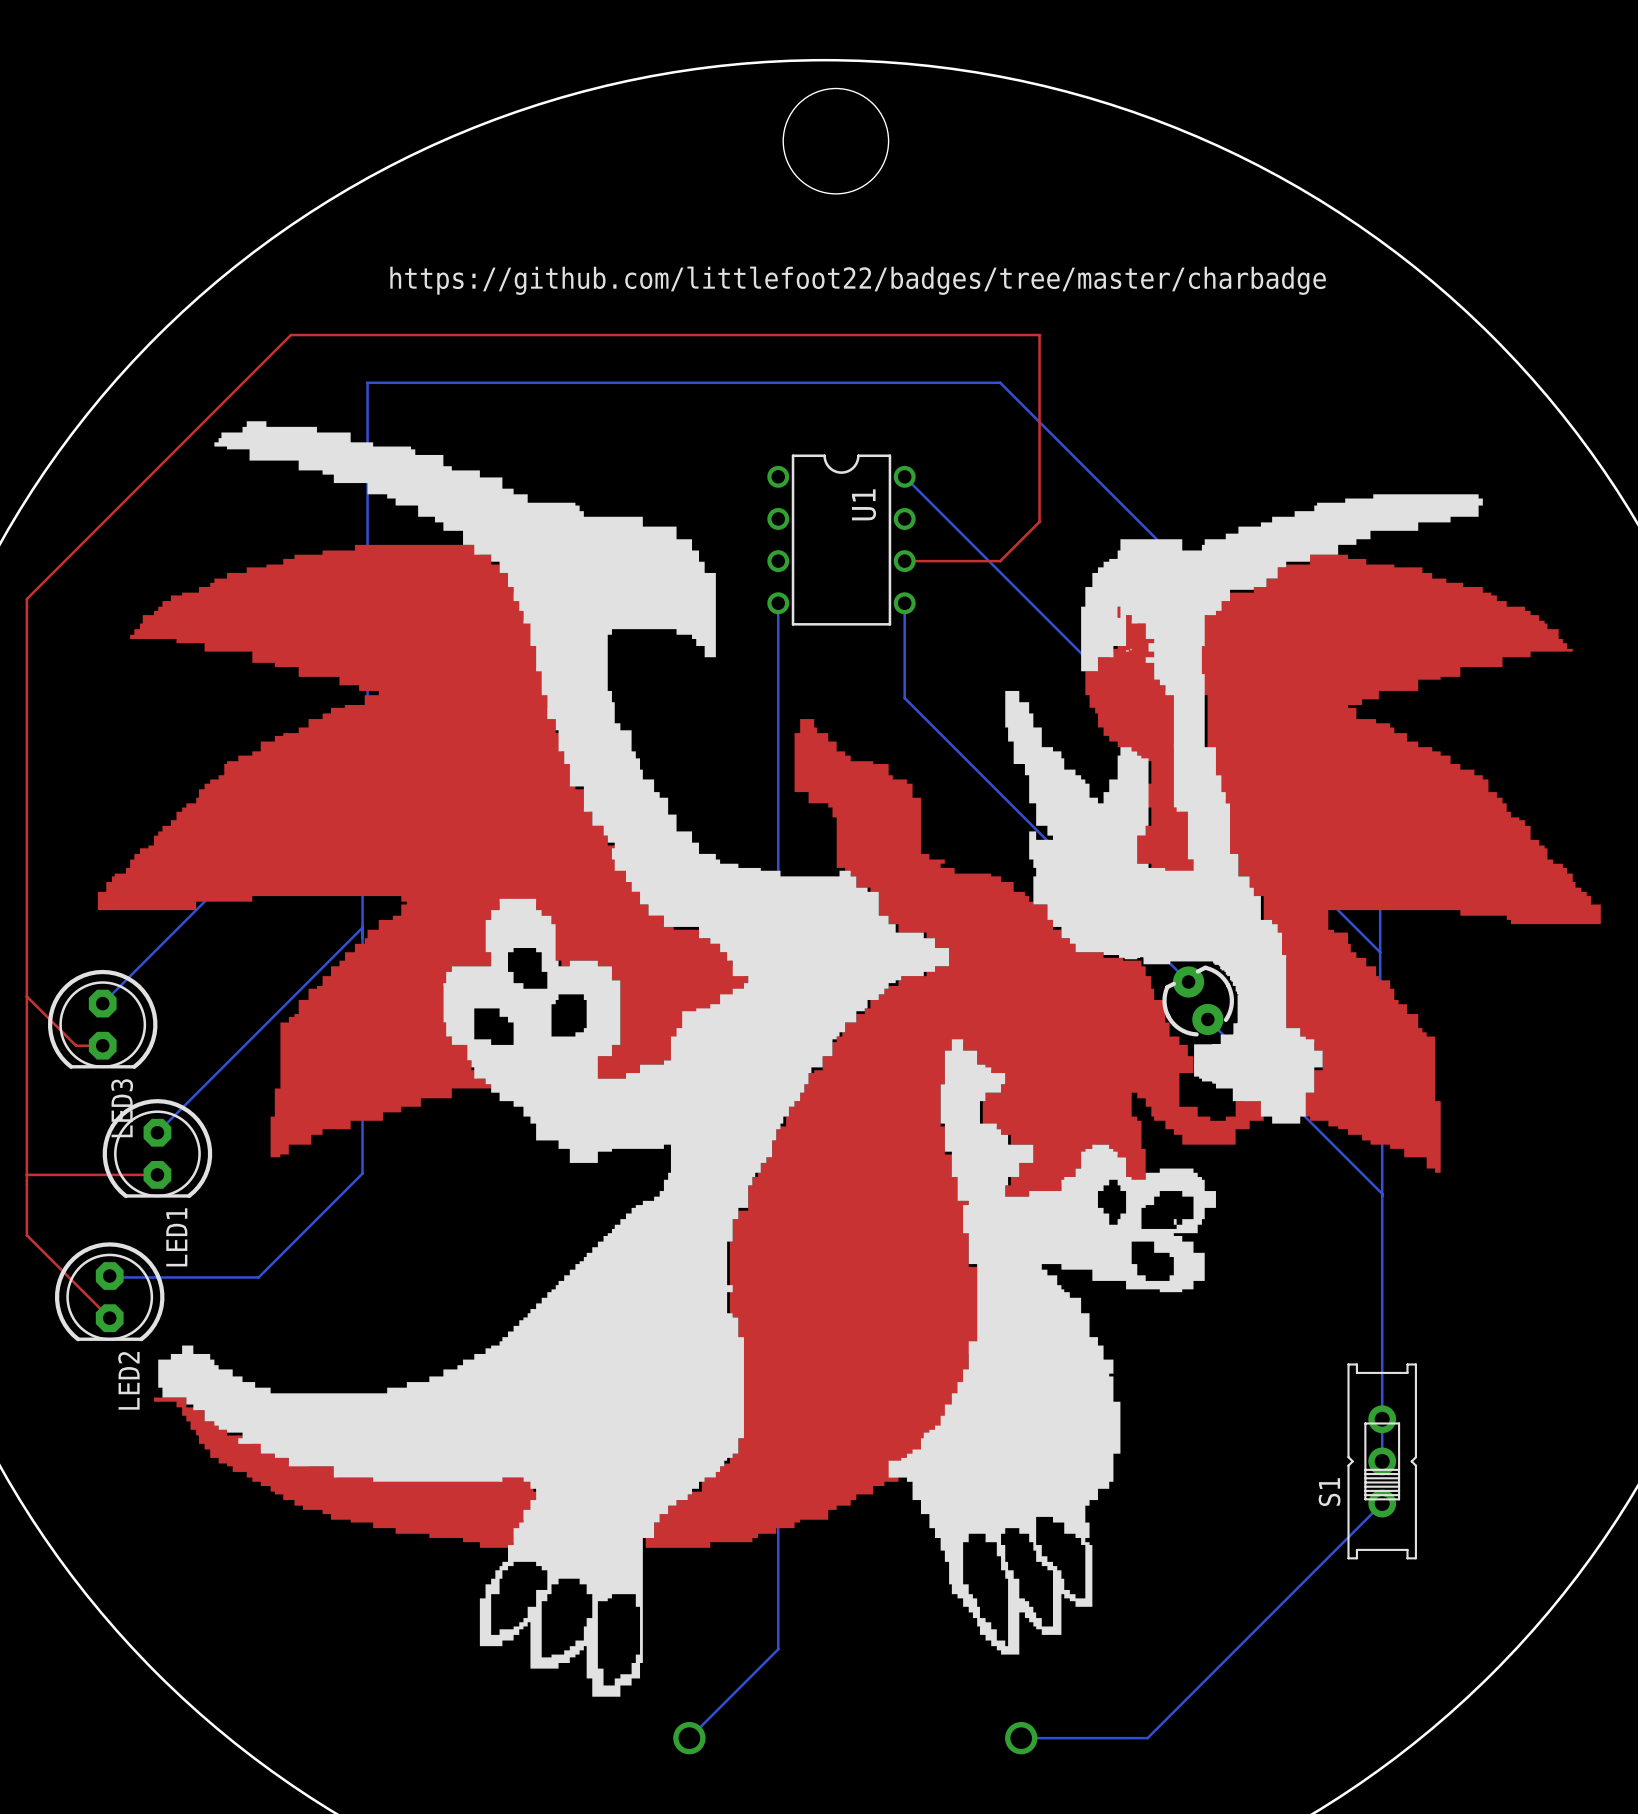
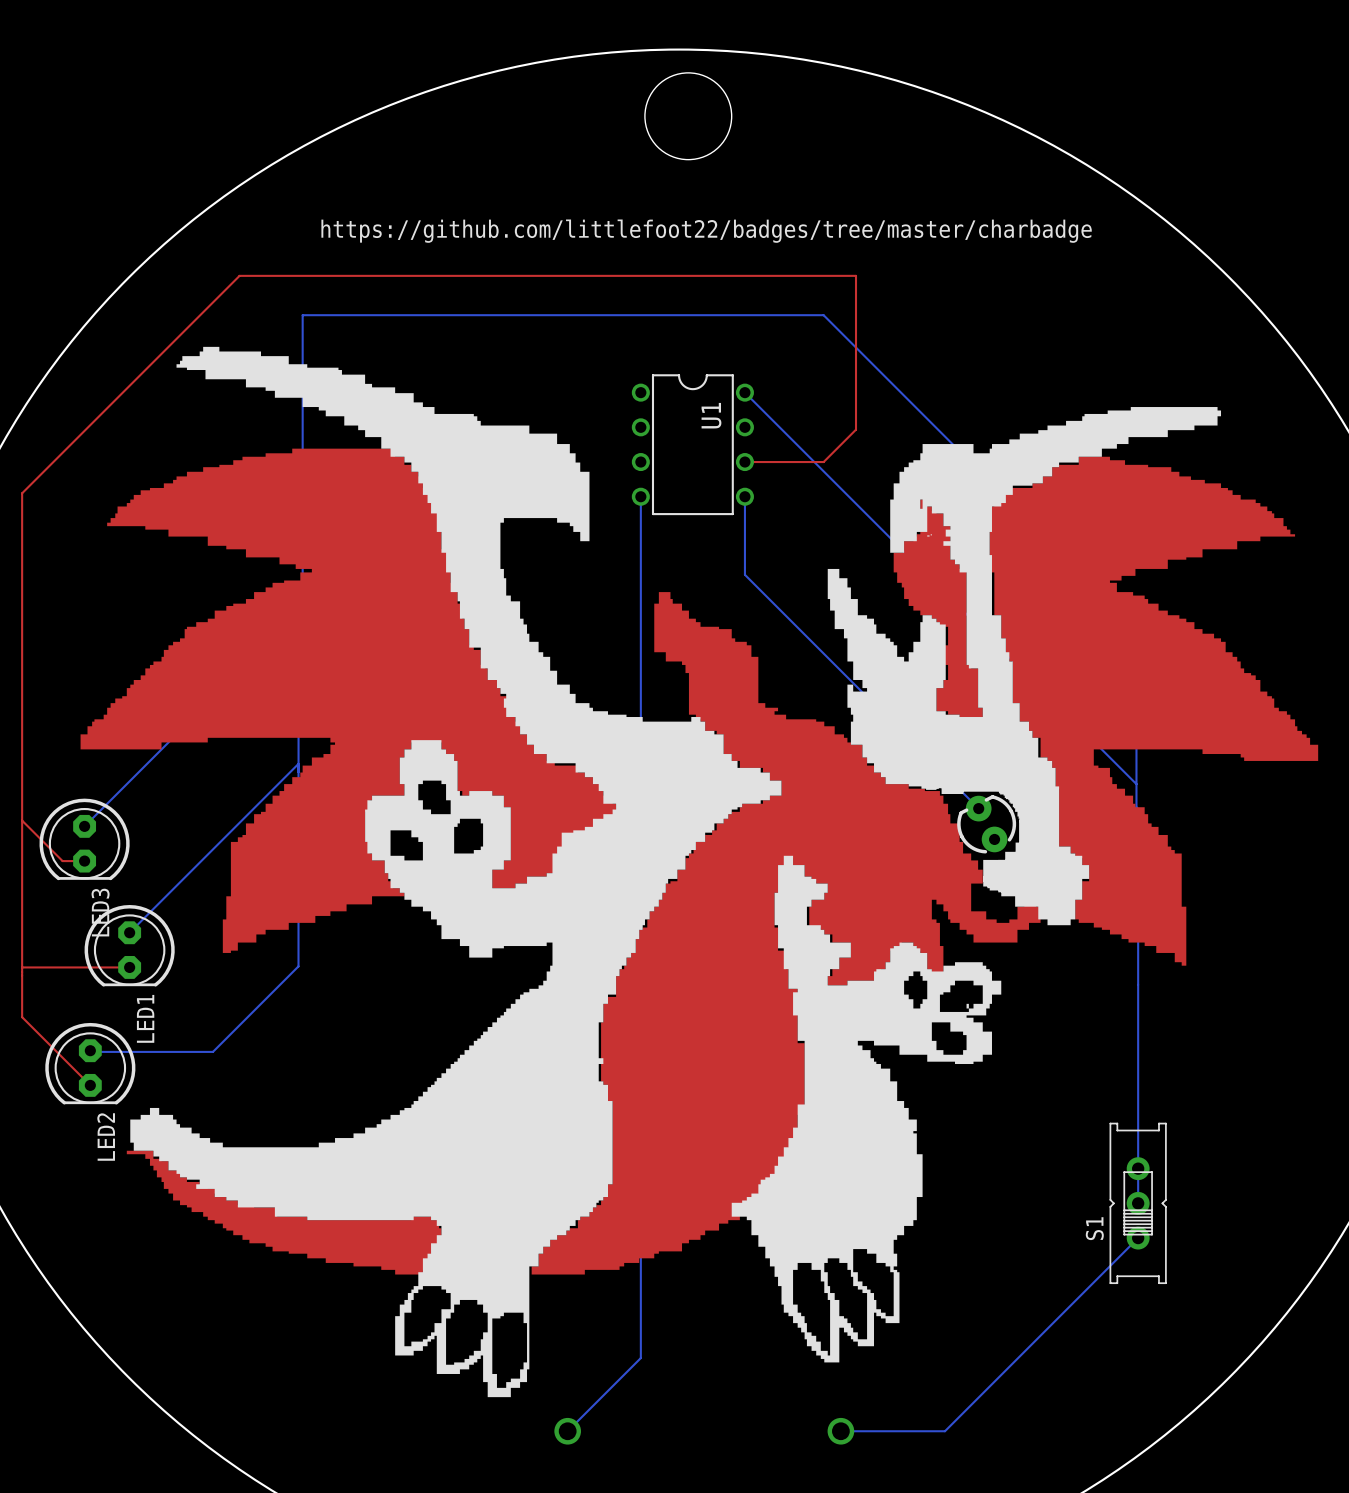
bottom track: (1207, 1019) (1382, 1193) -> none

